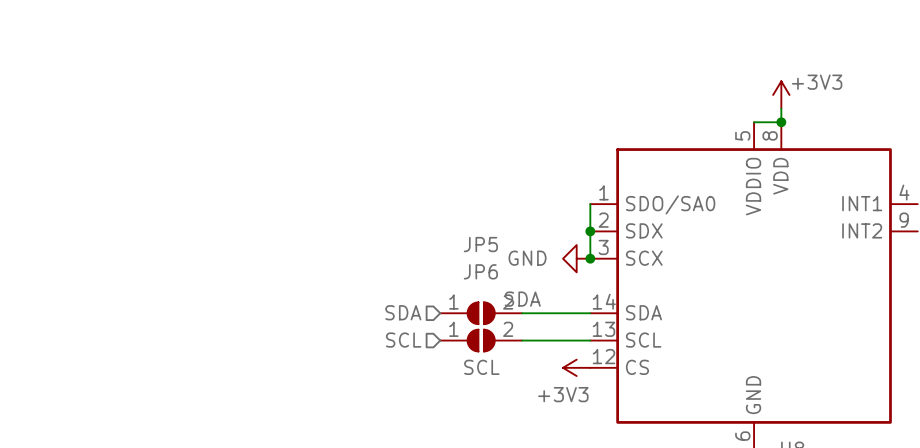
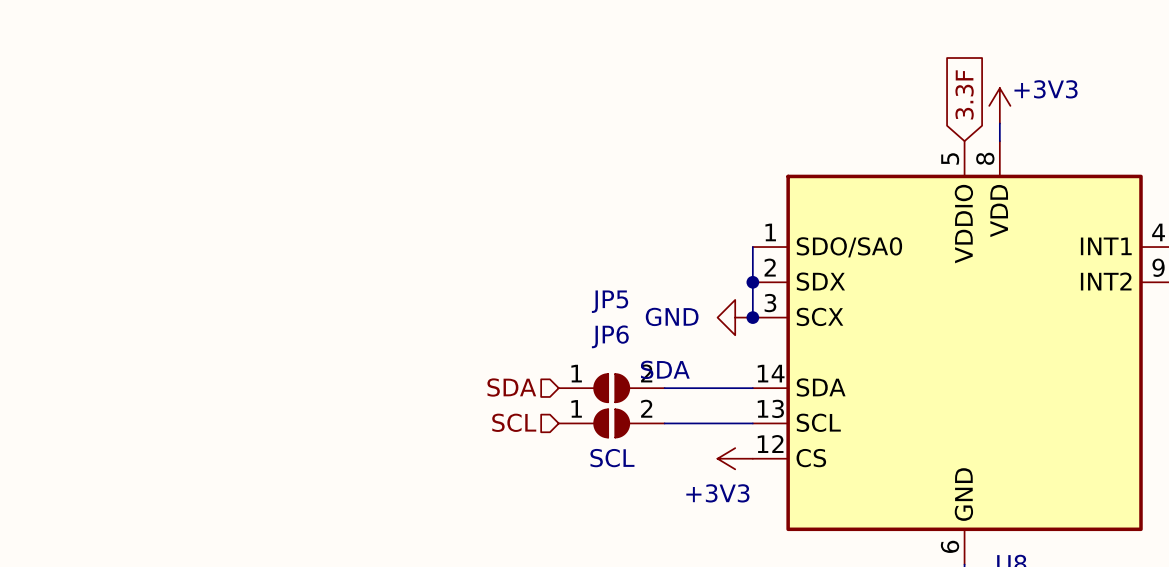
global label: none -> 3.3F (964, 94)
wire: (754, 122) (781, 122) -> none
junction: (781, 122) -> none

